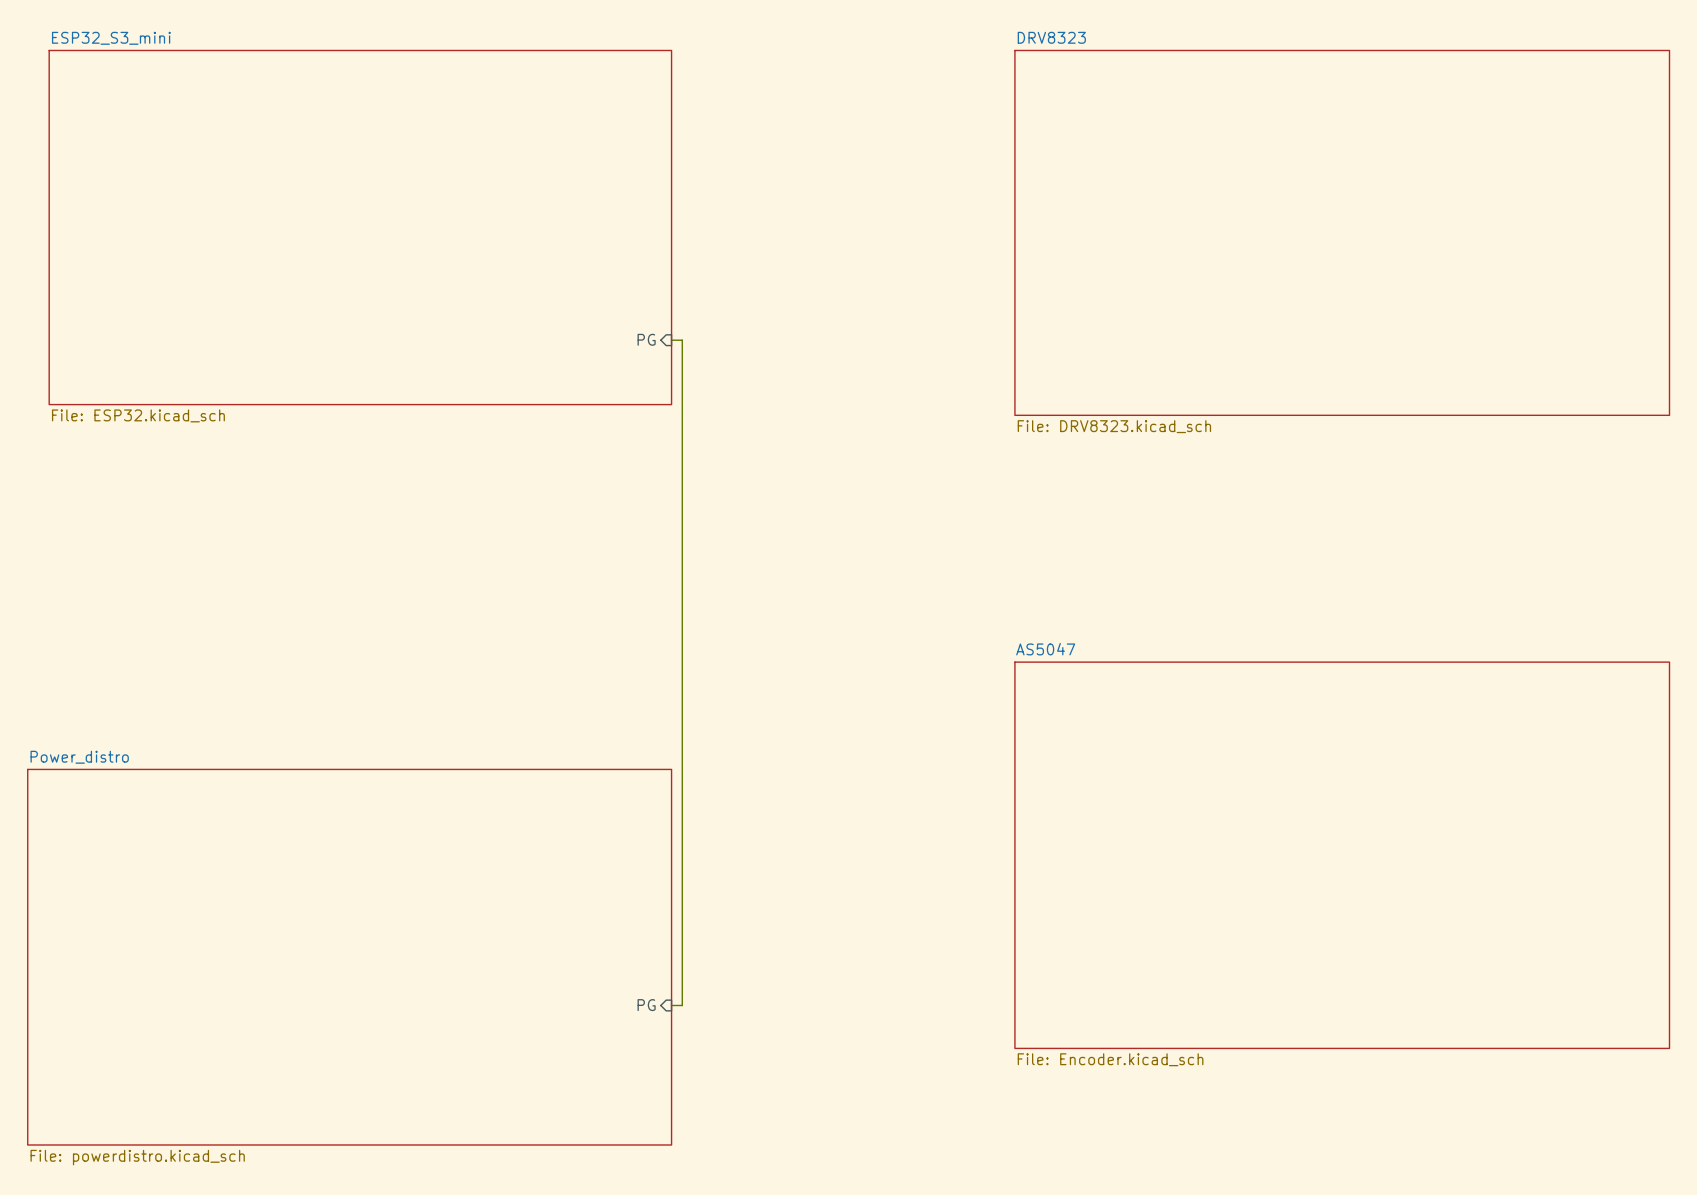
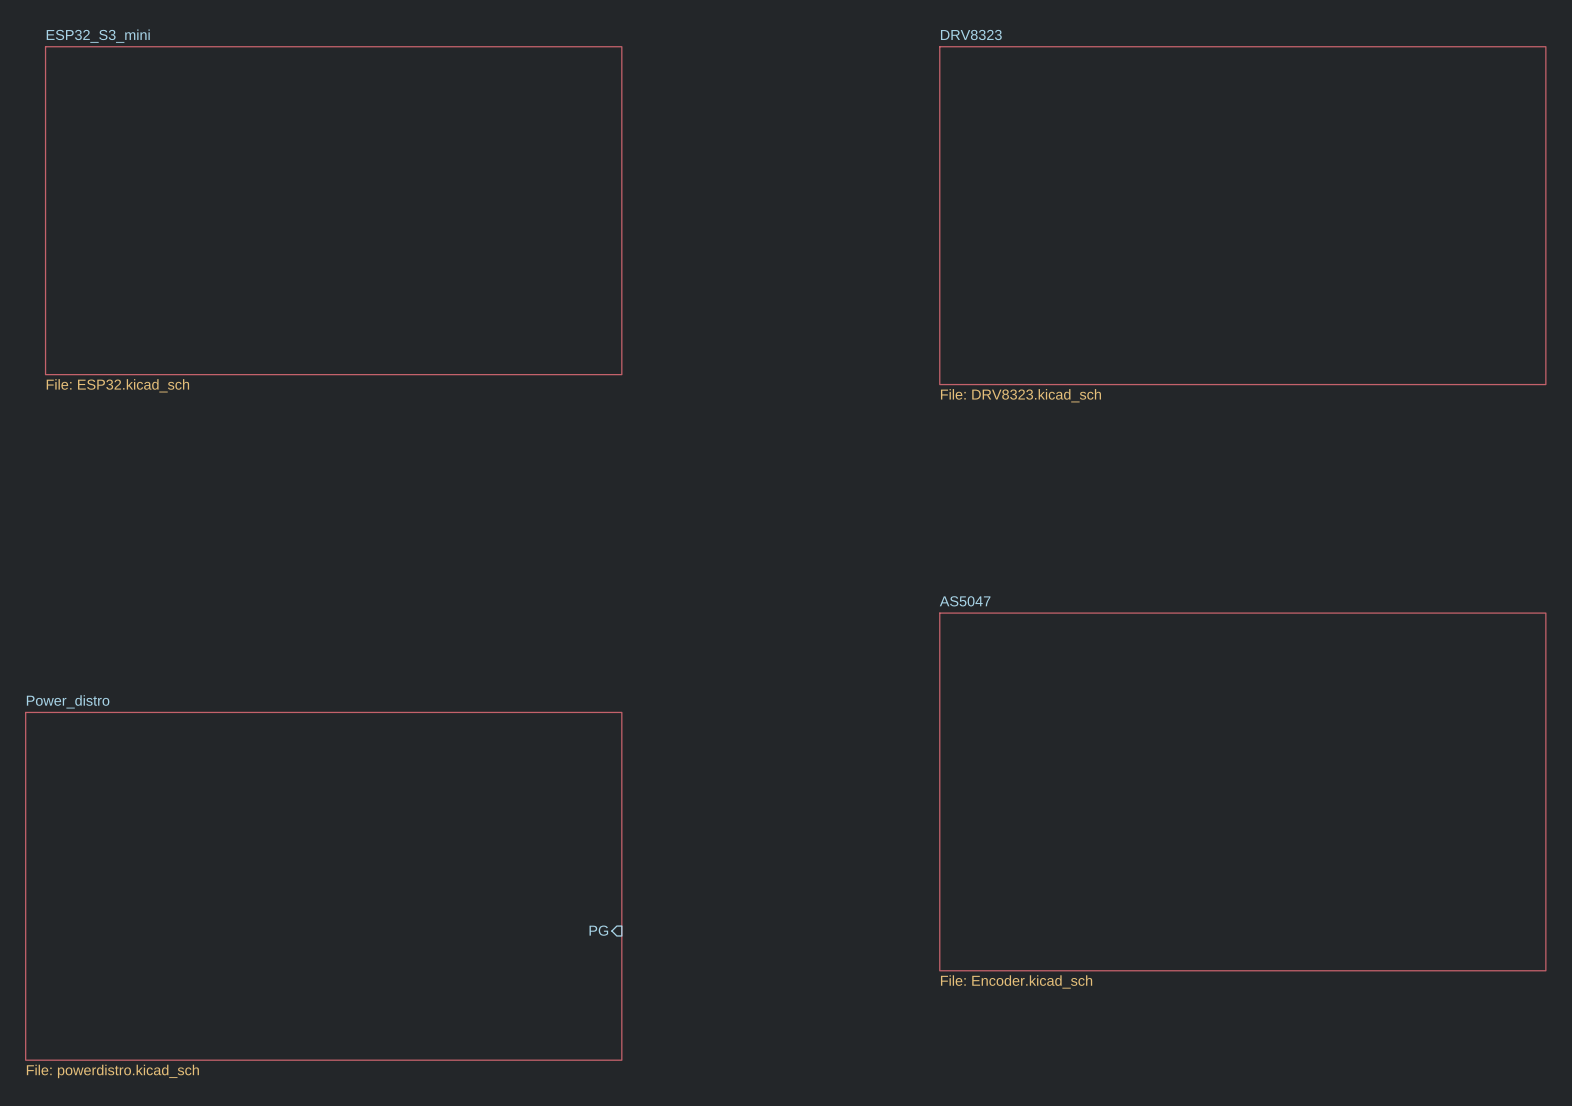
sheet pin: PG (646, 339) -> none
wire: (671, 340) (682, 340) (682, 1005) (671, 1005) -> none

